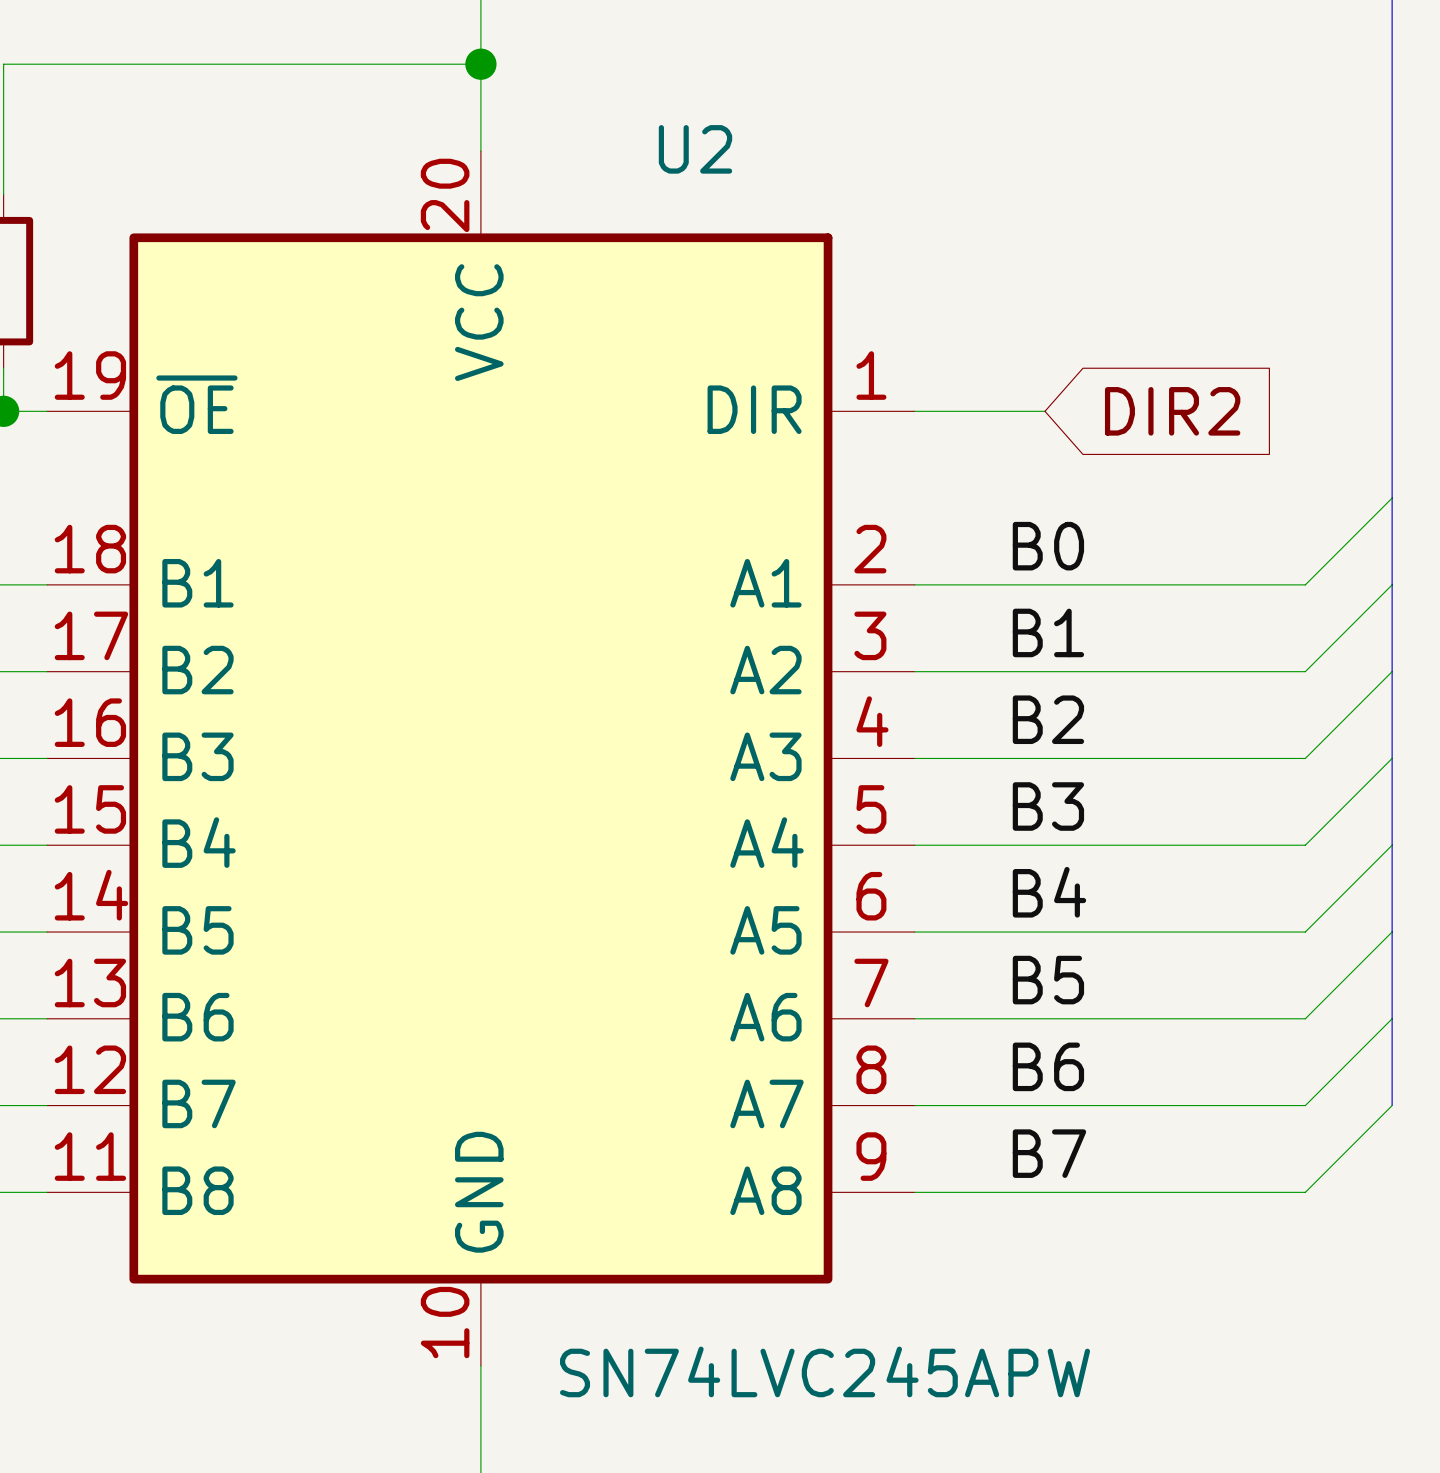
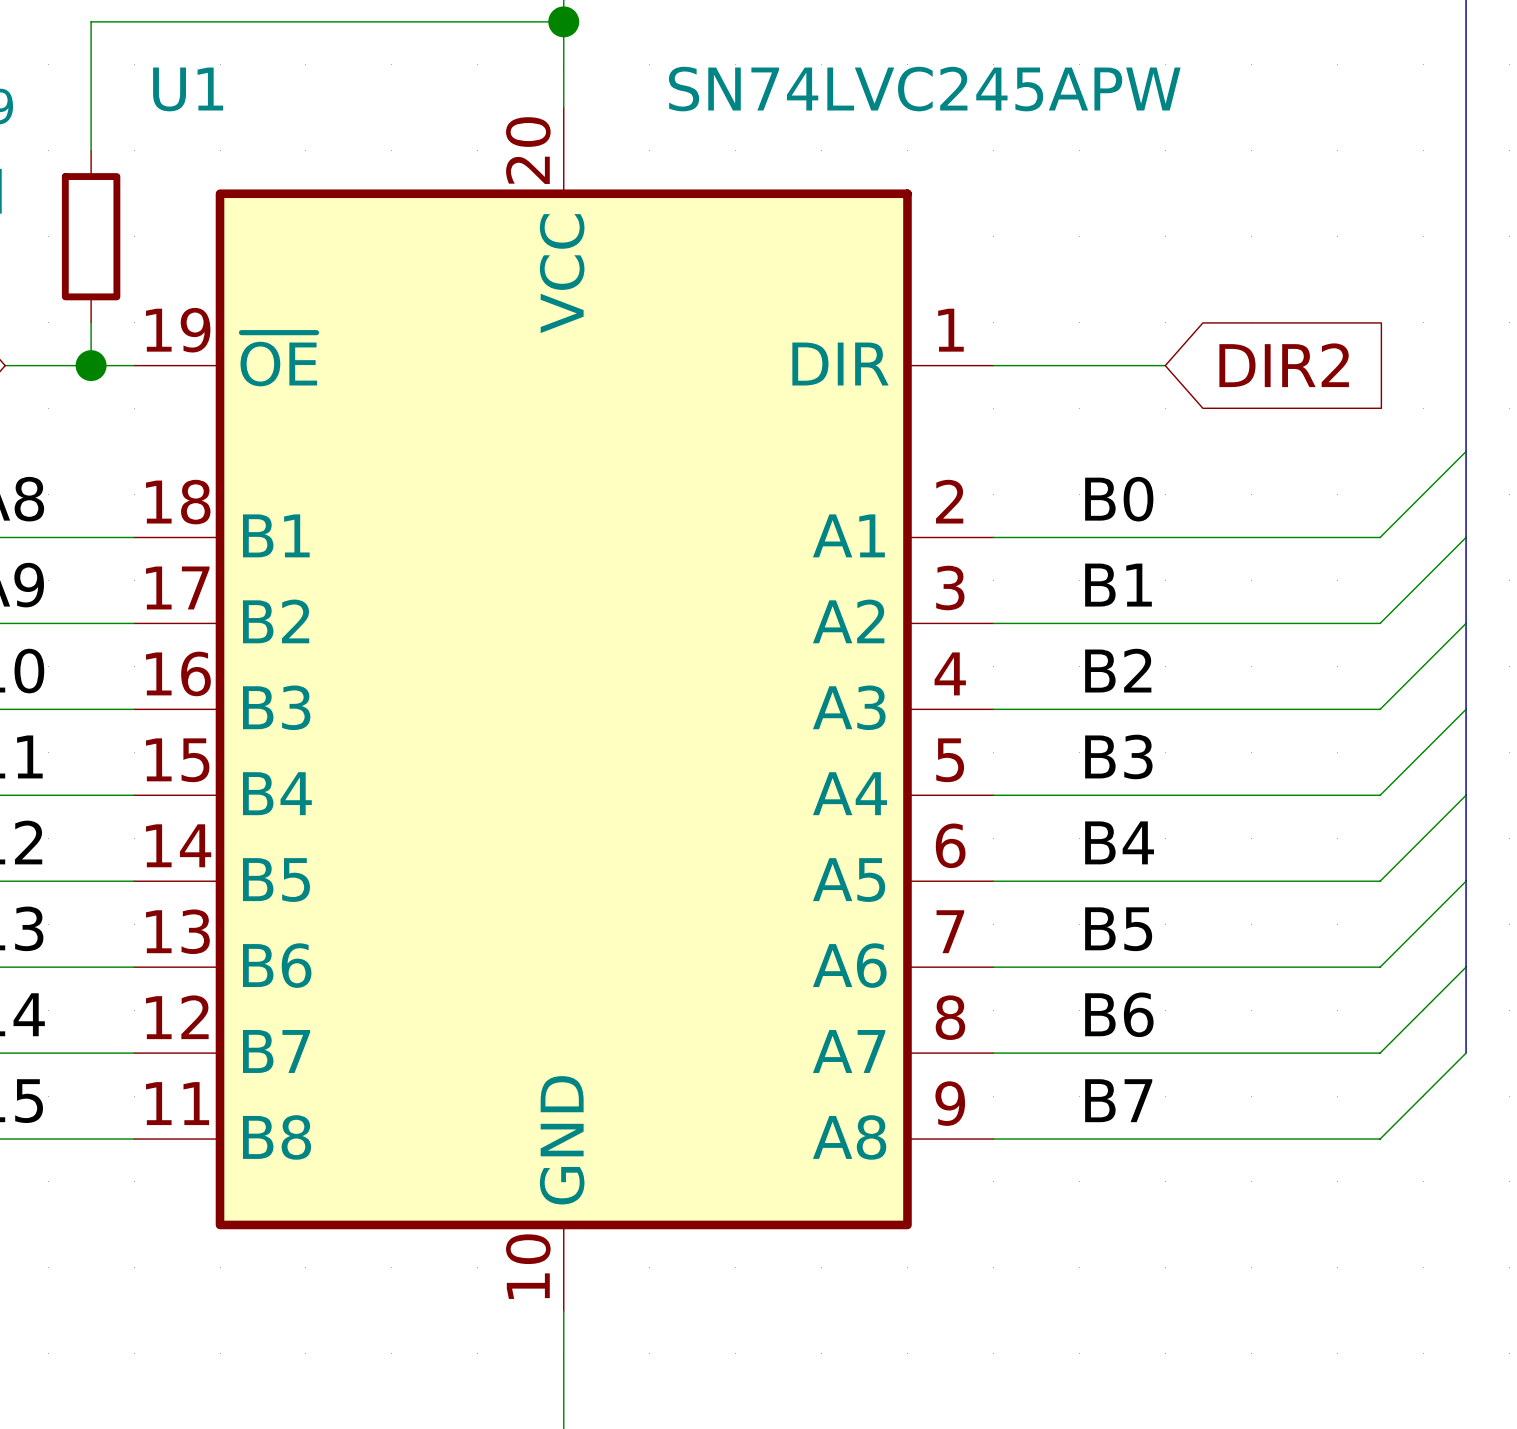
U2 name: U2 (695, 149) -> U1 (188, 89)
wire: none -> (1122, 365) (1165, 365)
global label position: DIR2 (1172, 411) -> DIR2 (1284, 365)
U2 value position: SN74LVC245APW (825, 1371) -> SN74LVC245APW (924, 89)

